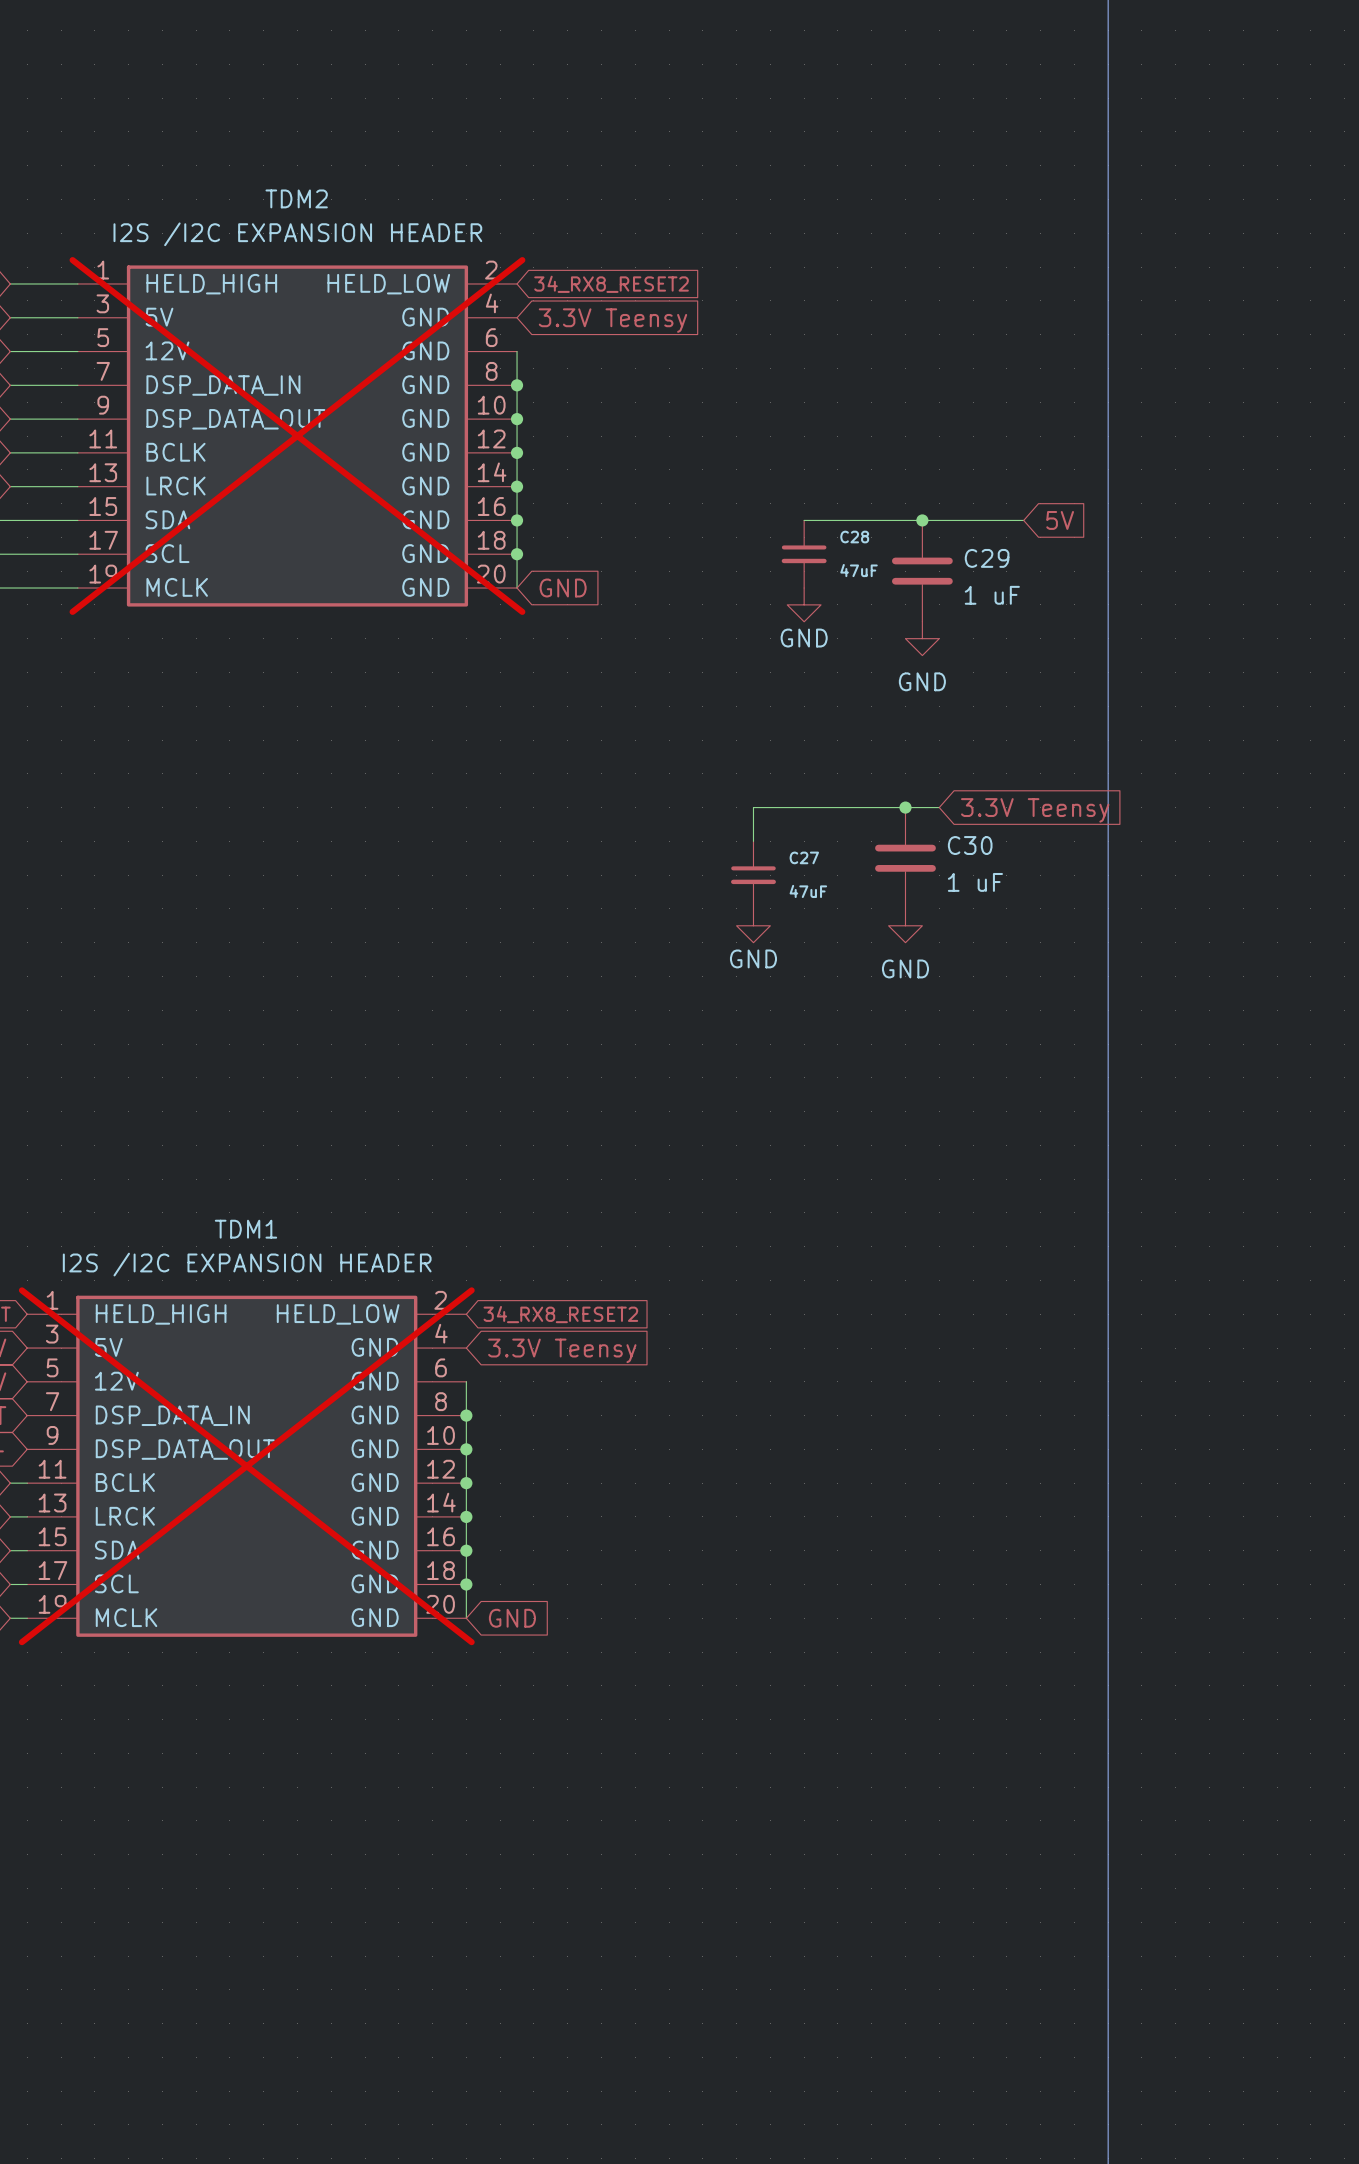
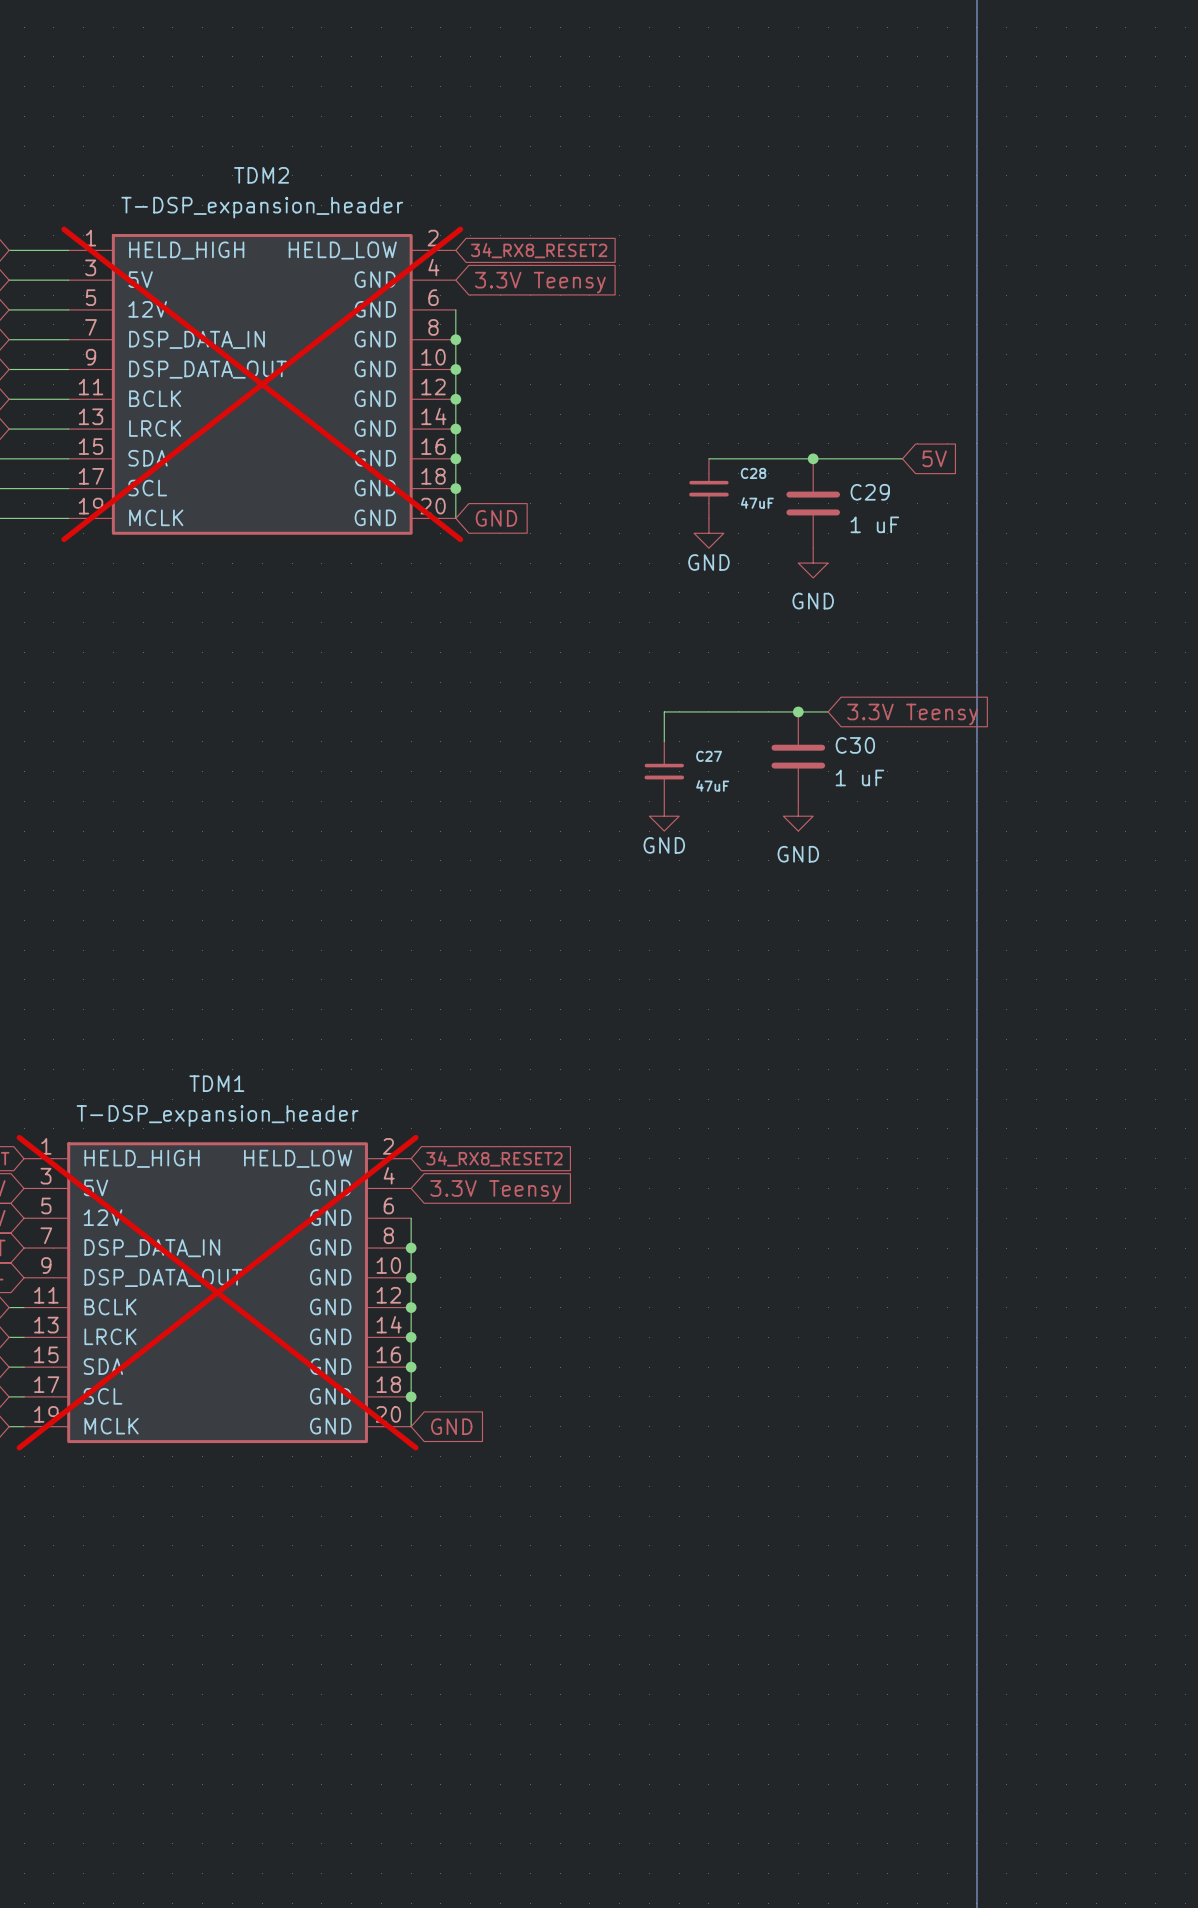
TDM2 value: I2S /I2C EXPANSION HEADER (297, 234) -> T-DSP_expansion_header (262, 207)
TDM1 value: I2S /I2C EXPANSION HEADER (247, 1264) -> T-DSP_expansion_header (217, 1115)

